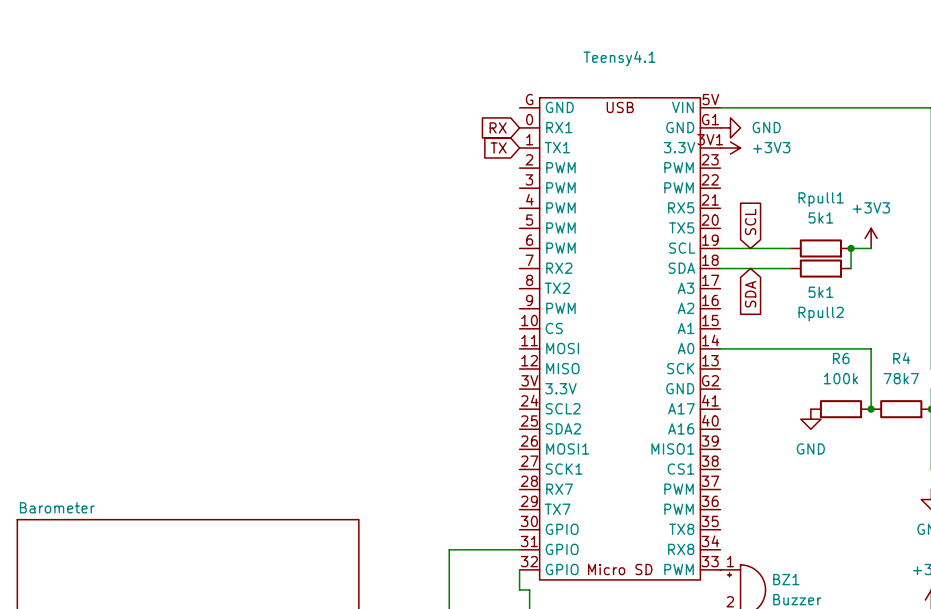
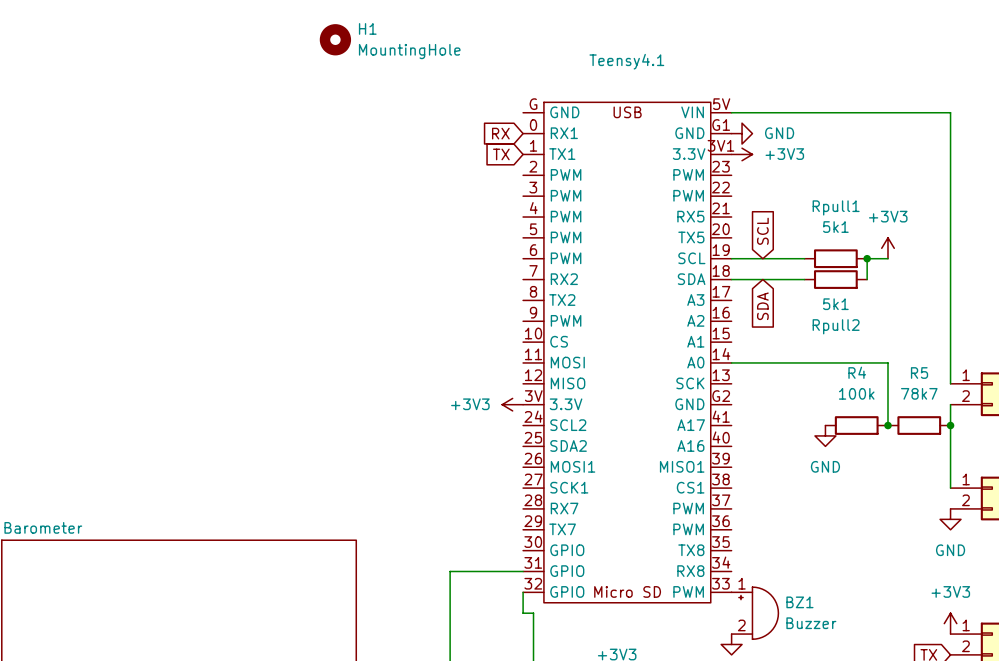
H1: none -> MountingHole (335, 39)
R6 name: R6 (841, 358) -> R4 (857, 372)
R4 name: R4 (901, 358) -> R5 (919, 373)
power symbol: none -> +3V3 (512, 404)

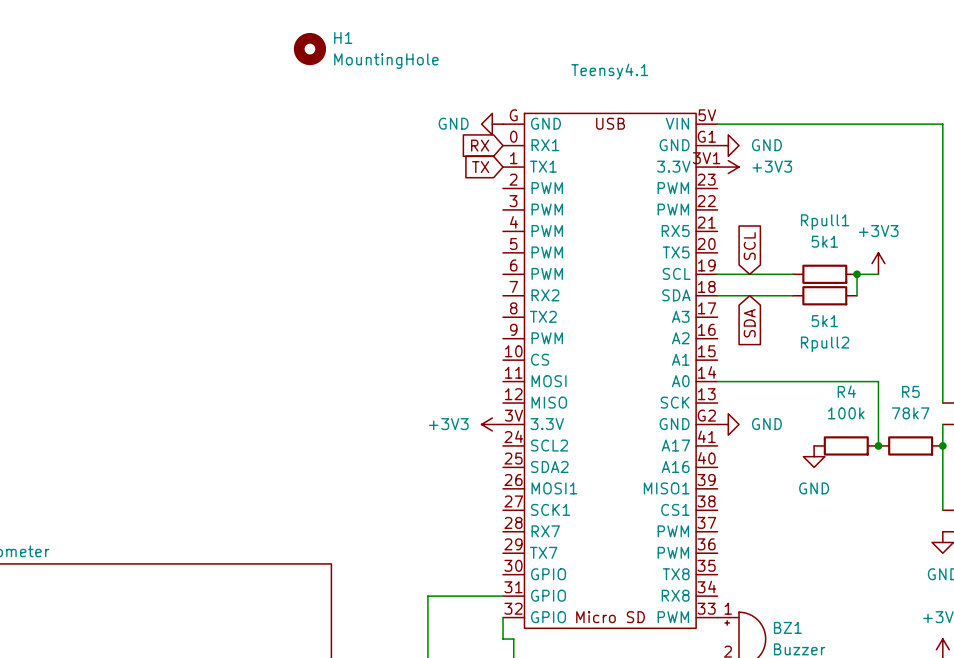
power symbol: none -> GND (492, 124)
power symbol: none -> GND (728, 424)

